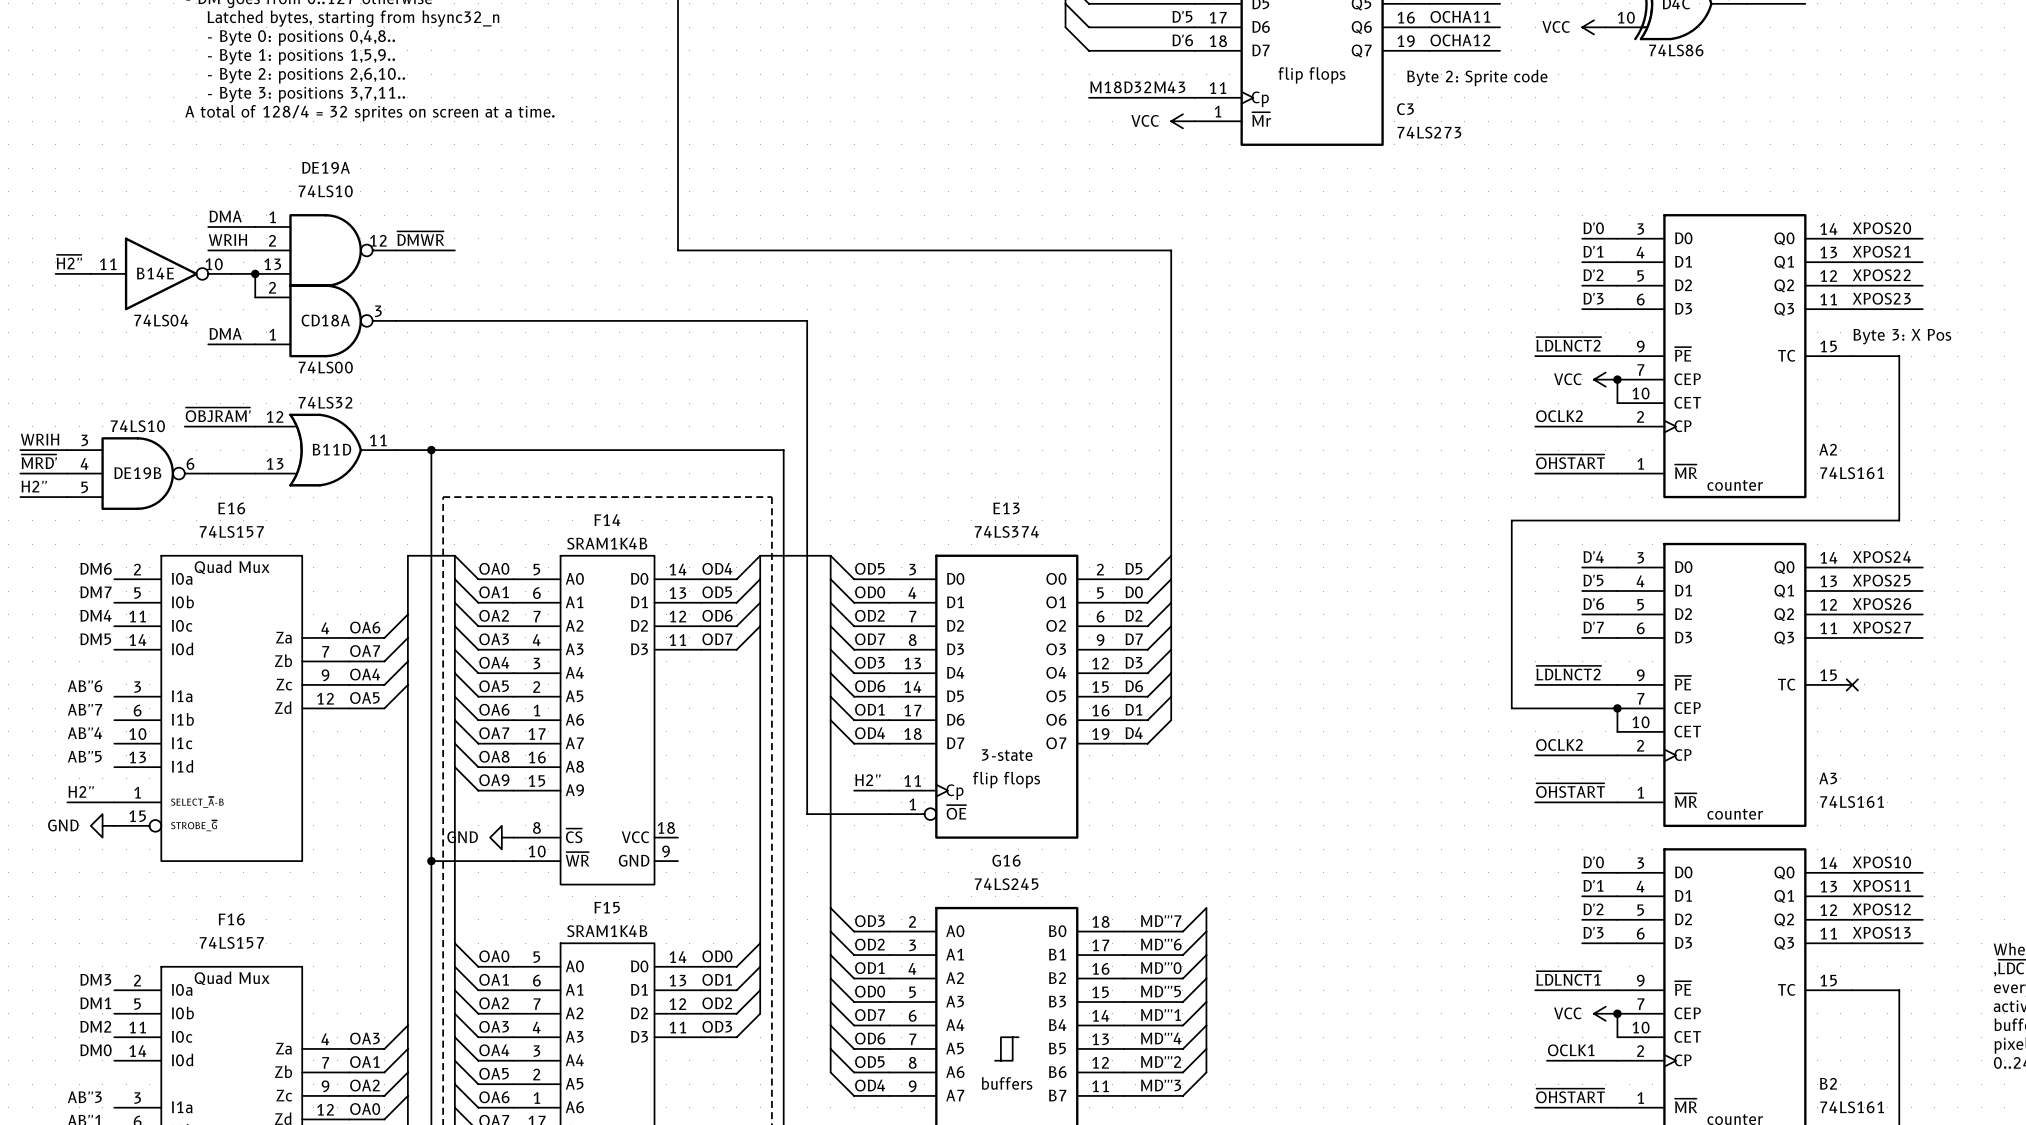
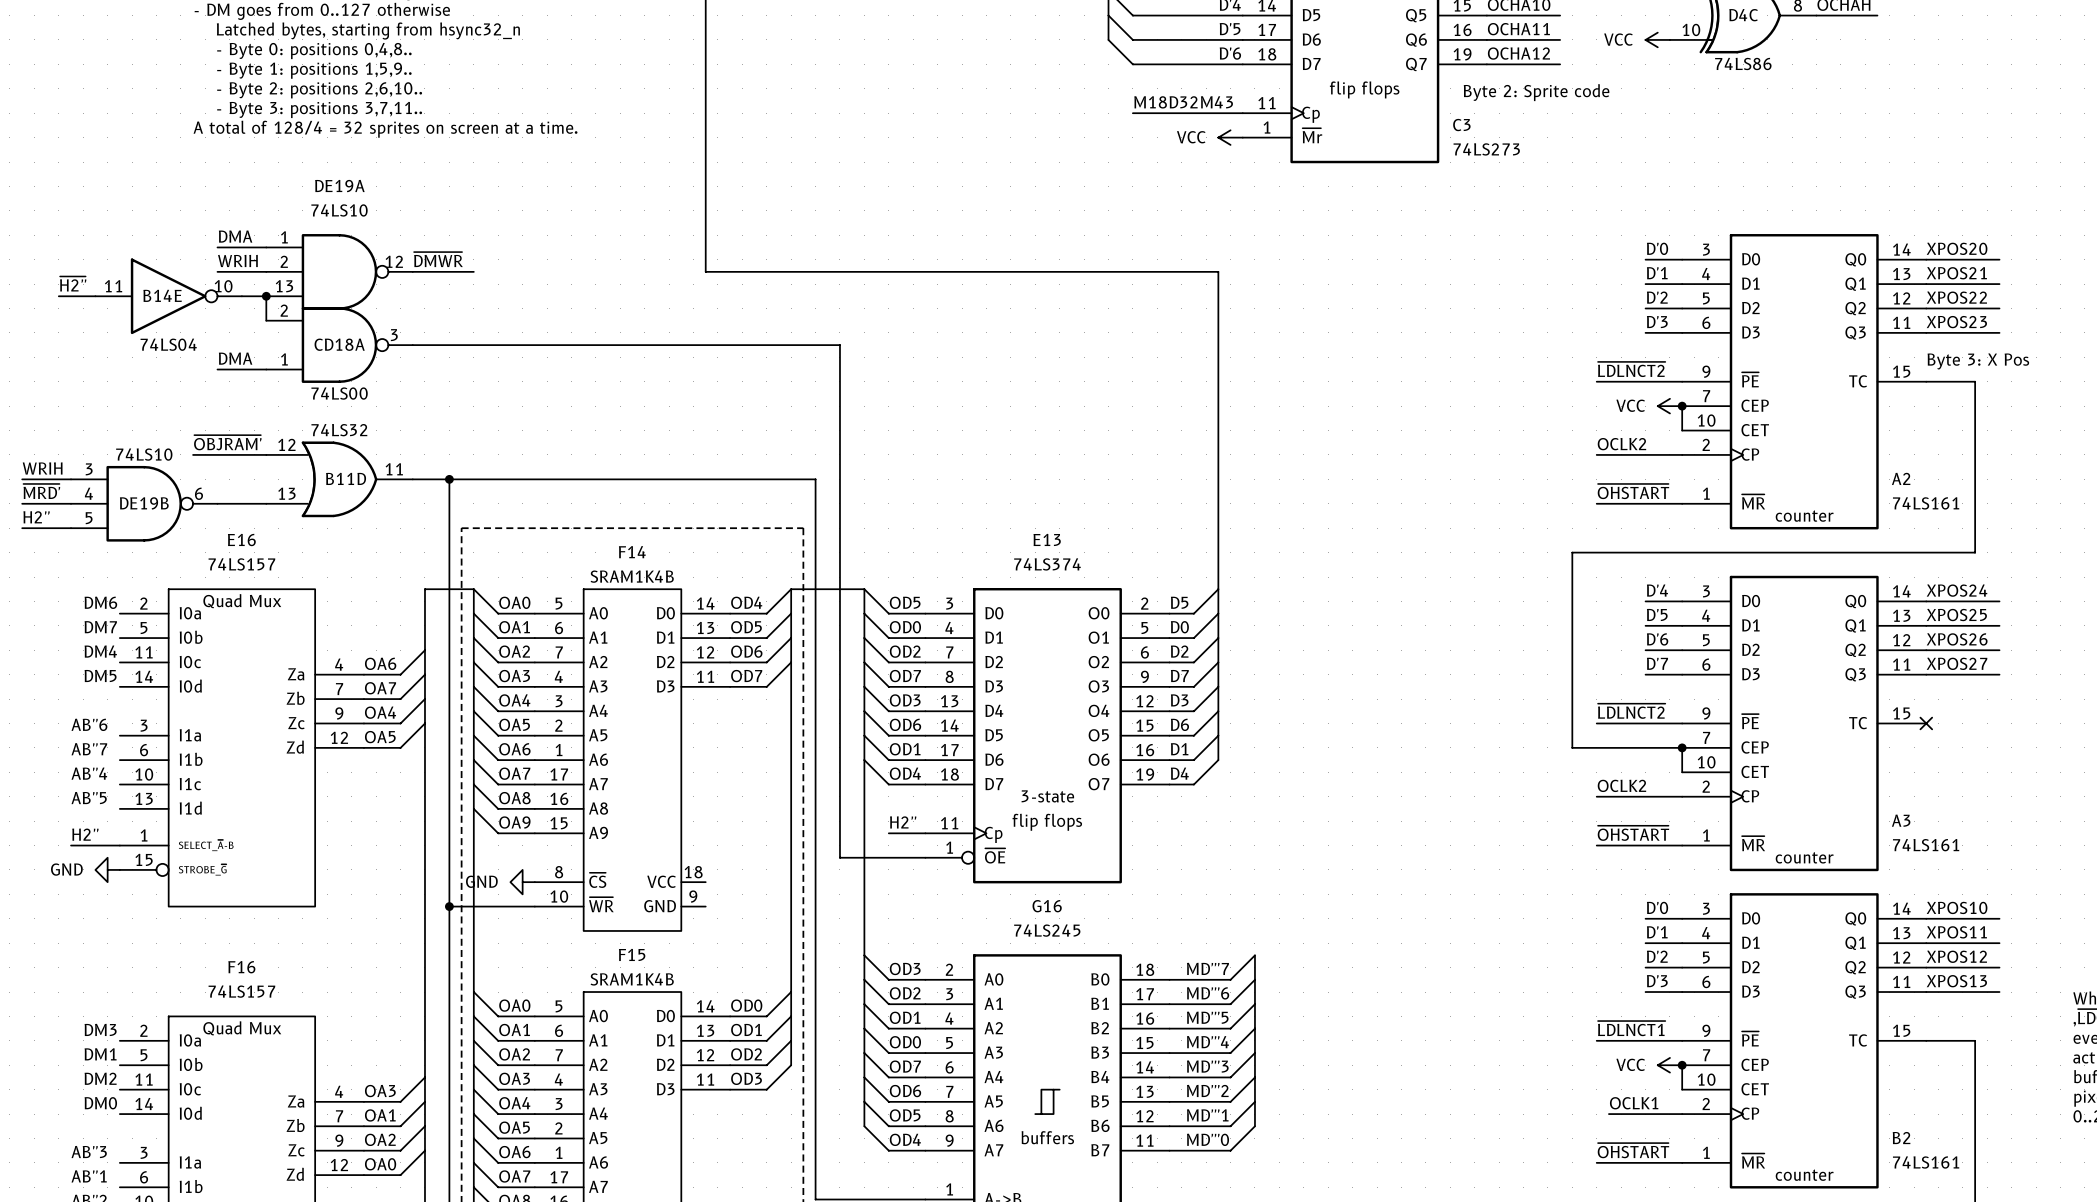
label: MD'''0 (1161, 968) -> MD'''5 (1207, 1017)
label: MD'''5 (1161, 991) -> MD'''4 (1207, 1042)
label: MD'''1 (1161, 1015) -> MD'''3 (1207, 1066)
label: MD'''4 (1161, 1038) -> MD'''2 (1207, 1090)
label: MD'''2 (1161, 1061) -> MD'''1 (1207, 1115)
label: MD'''3 (1161, 1085) -> MD'''0 (1208, 1139)

